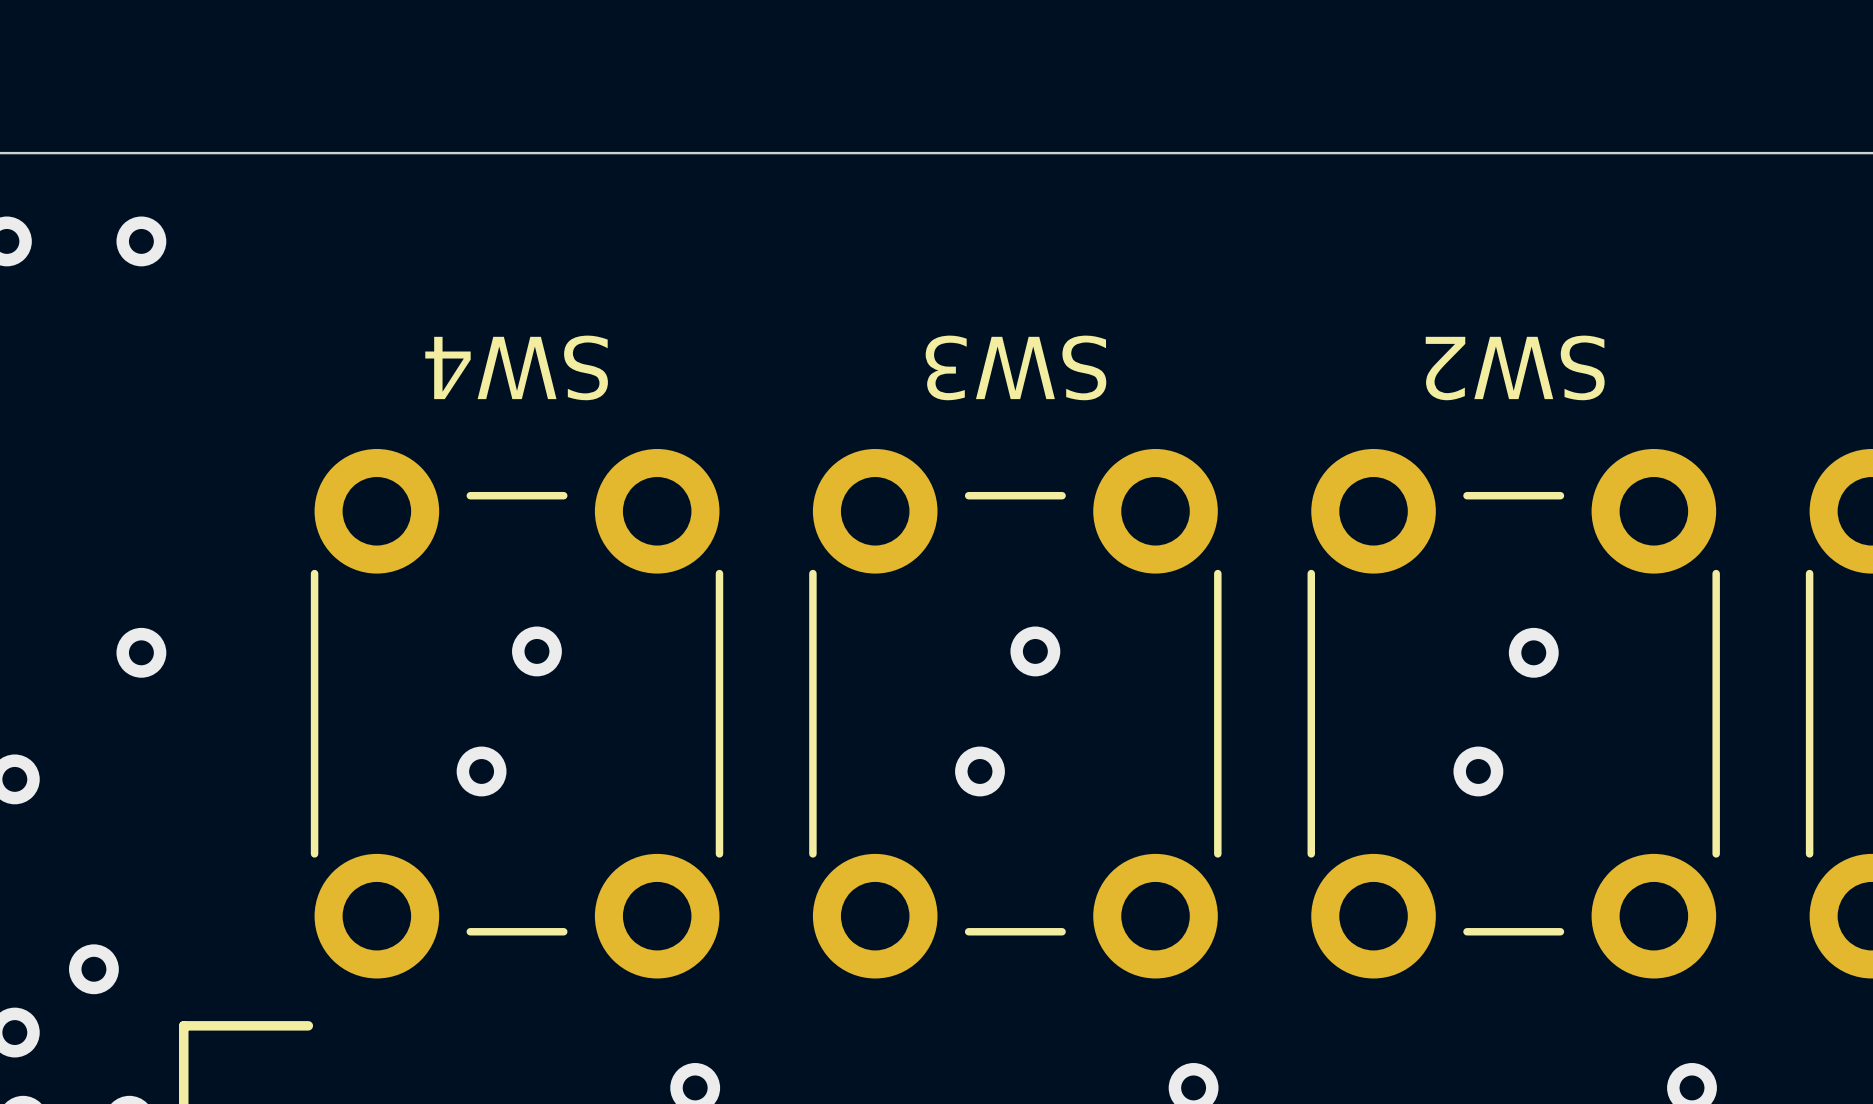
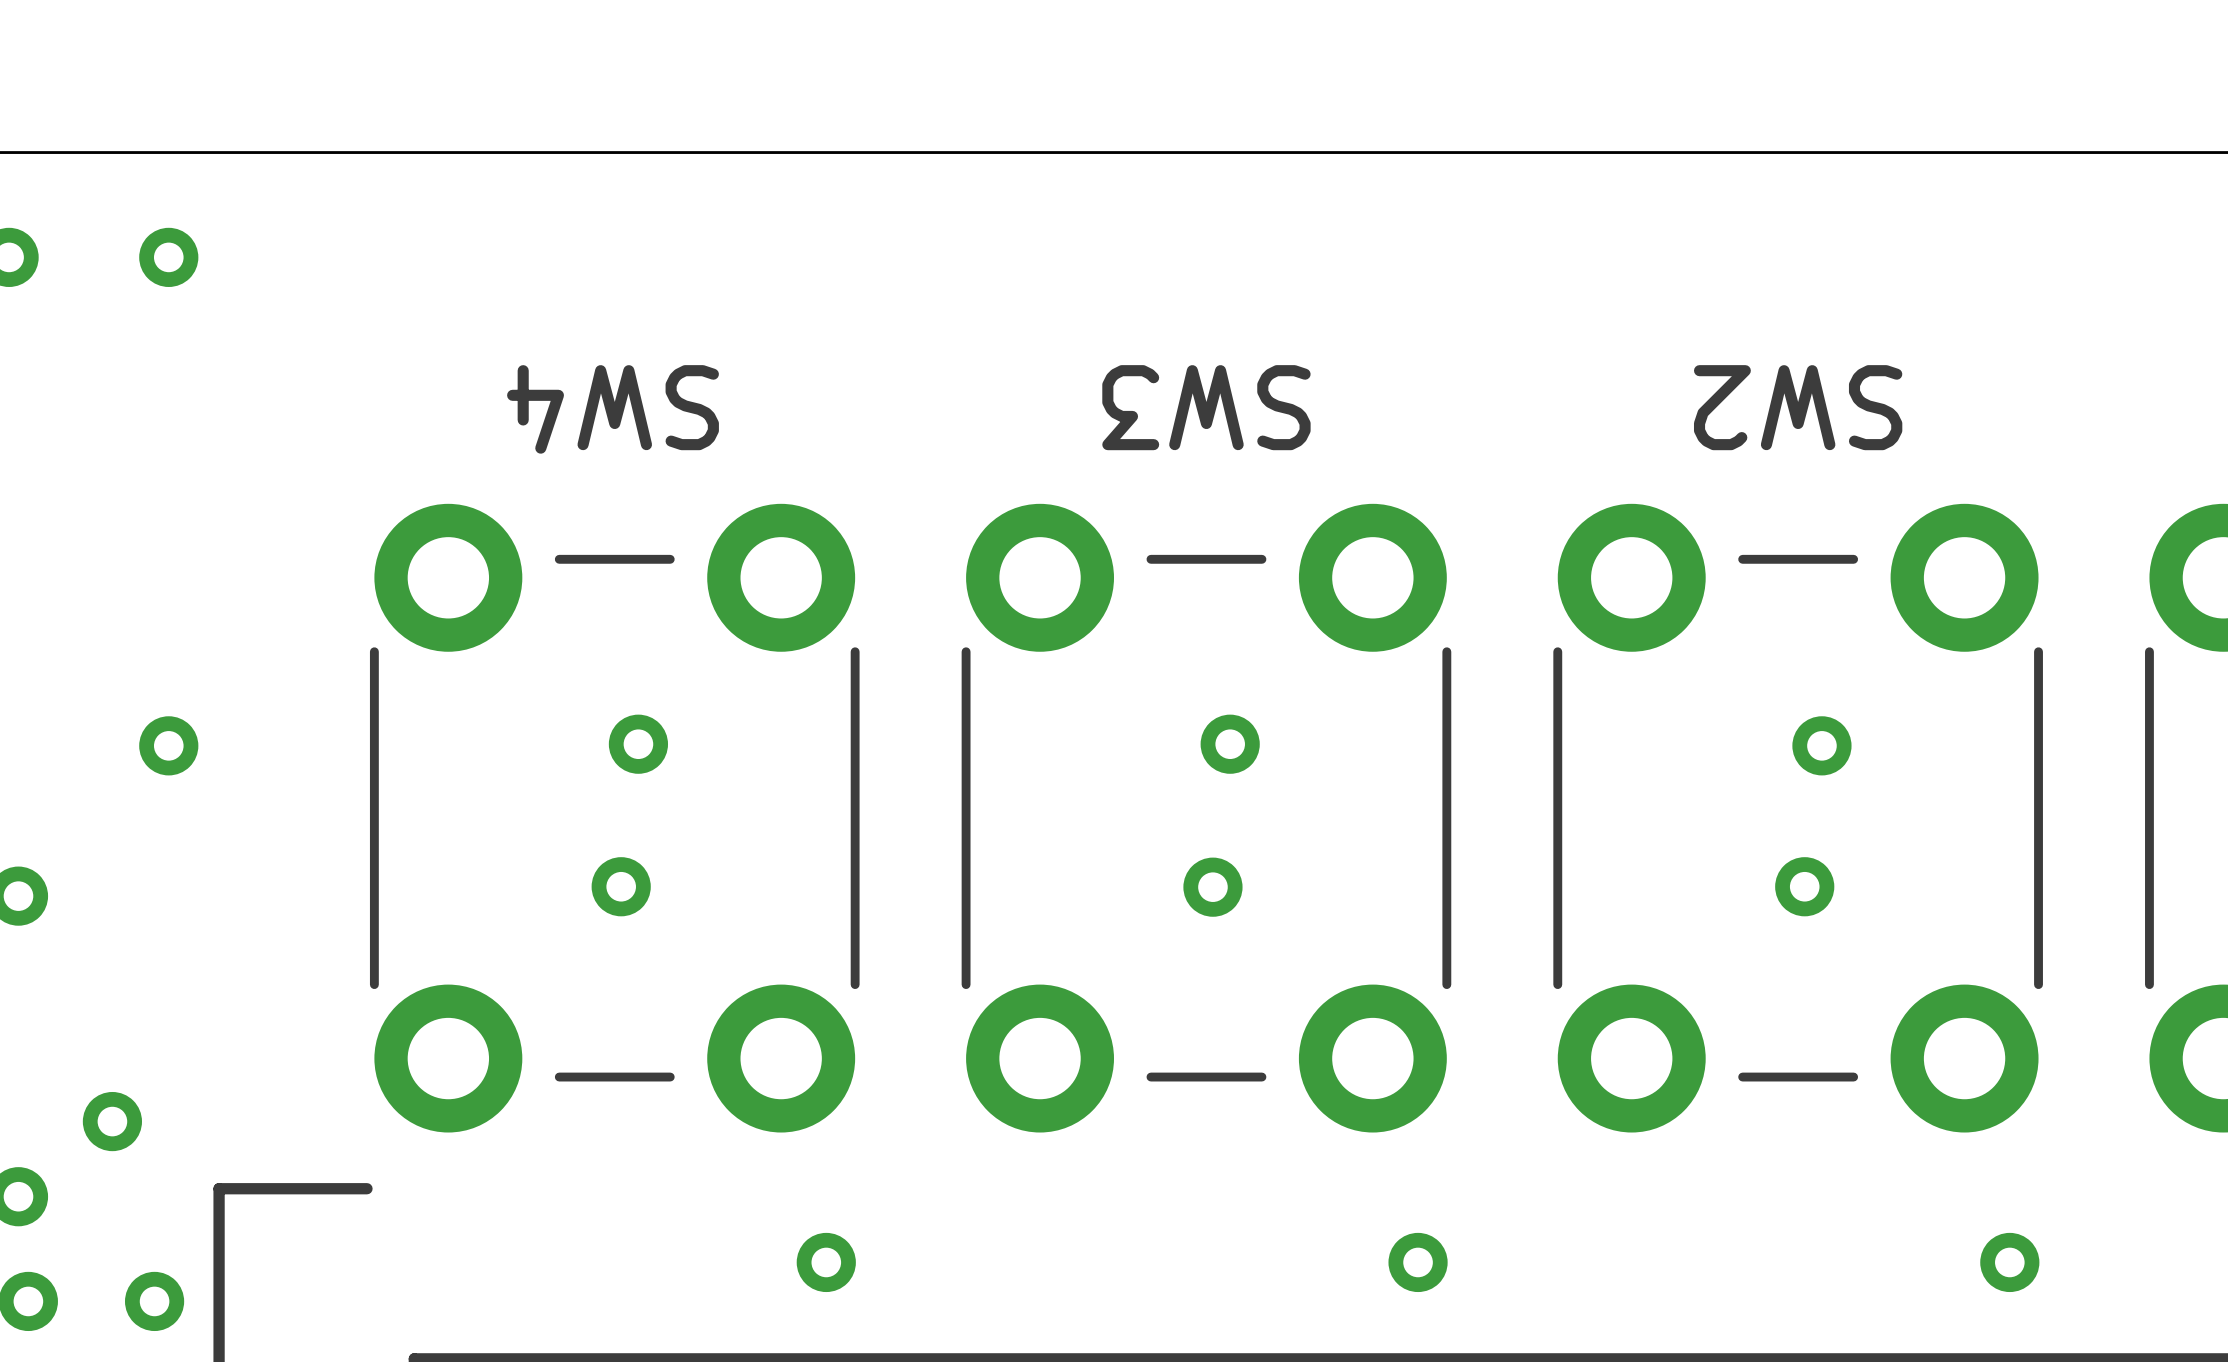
via position: (481, 771) -> (621, 886)
via position: (979, 771) -> (1212, 887)
via position: (1478, 771) -> (1804, 886)

